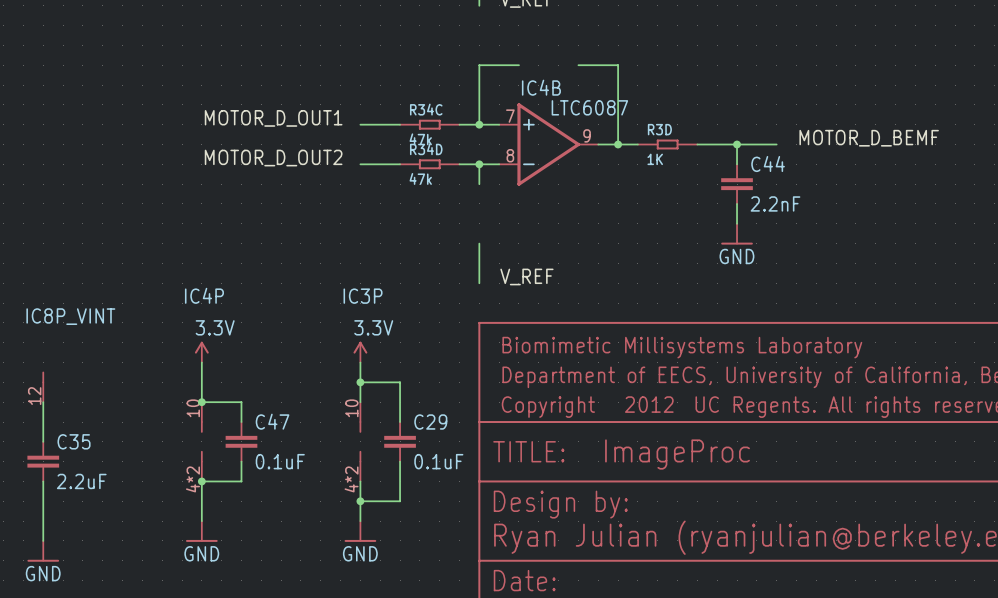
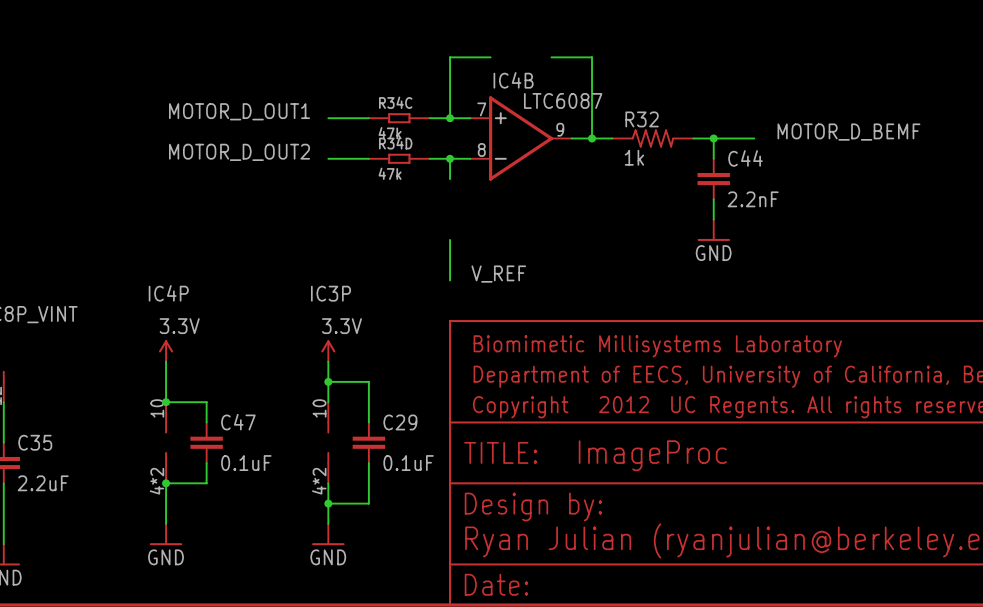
R3D: 1K (667, 144) -> none
R32: none -> 1k (652, 138)

